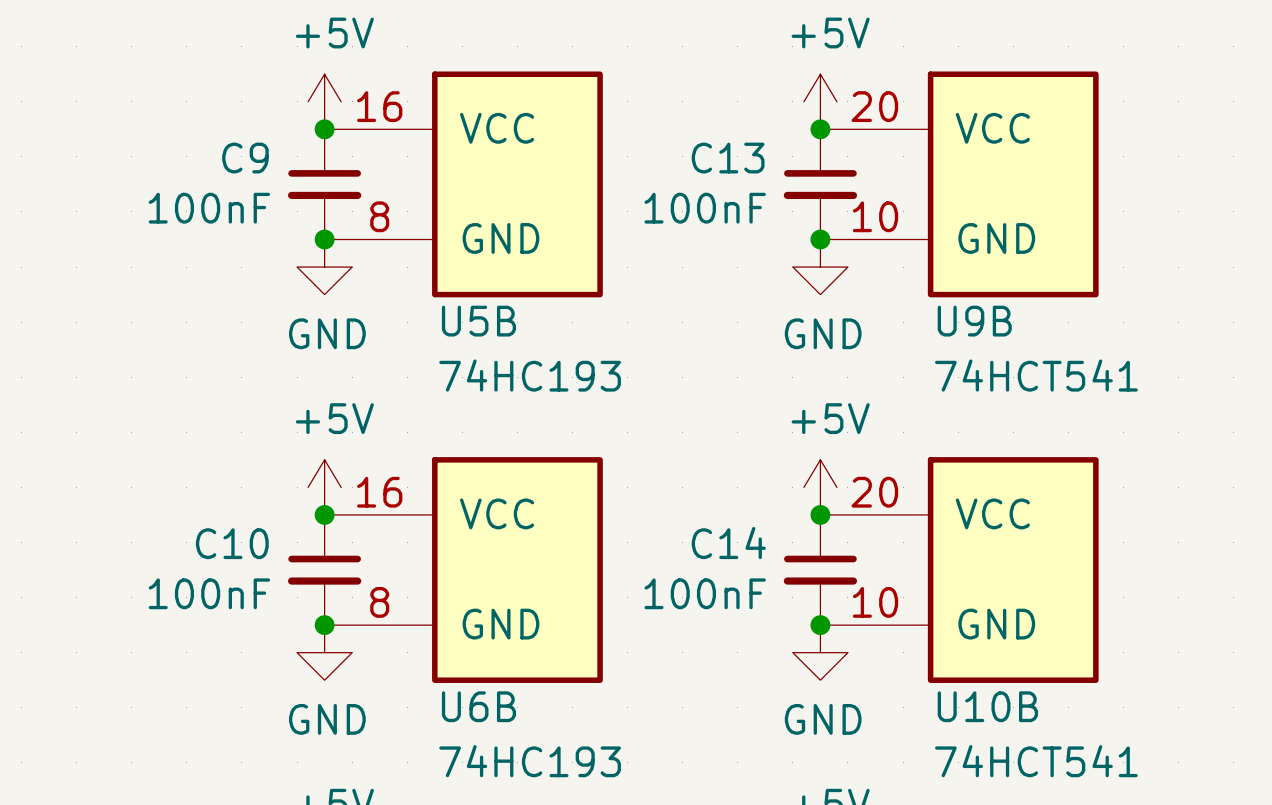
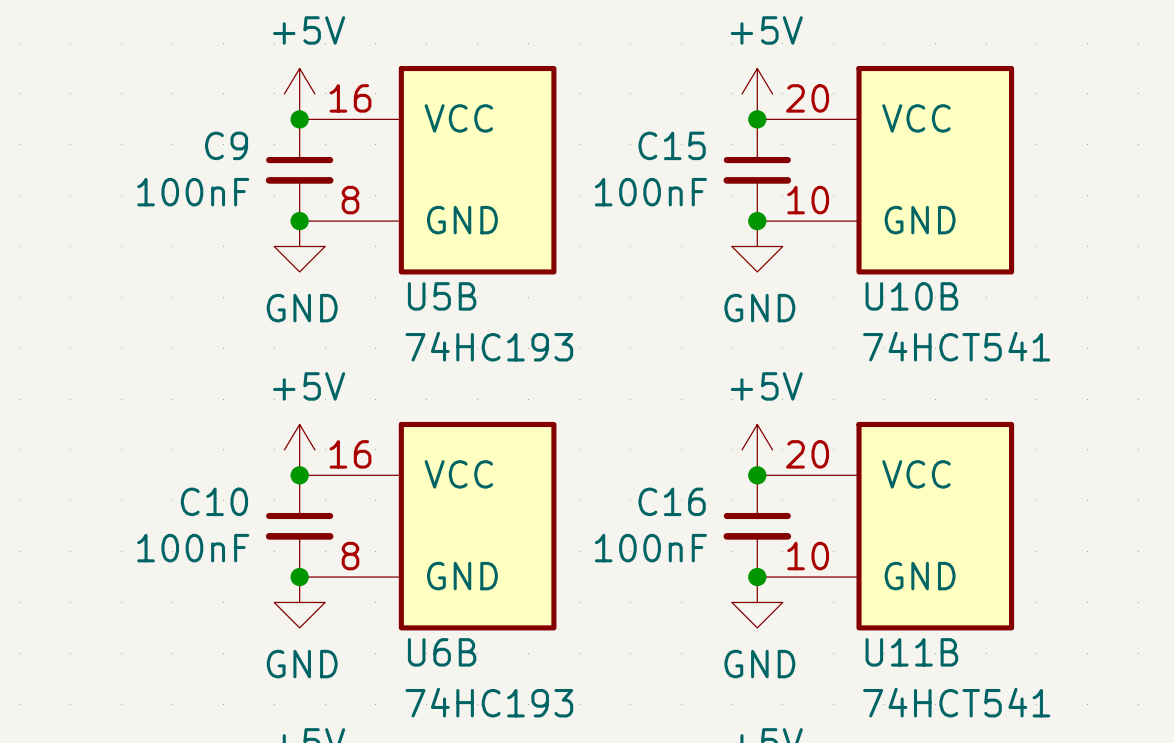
C13 name: C13 (728, 158) -> C15 (672, 145)
U9B name: U9B (974, 321) -> U10B (911, 296)
C14 name: C14 (728, 543) -> C16 (672, 501)
U10B name: U10B (987, 706) -> U11B (911, 652)

